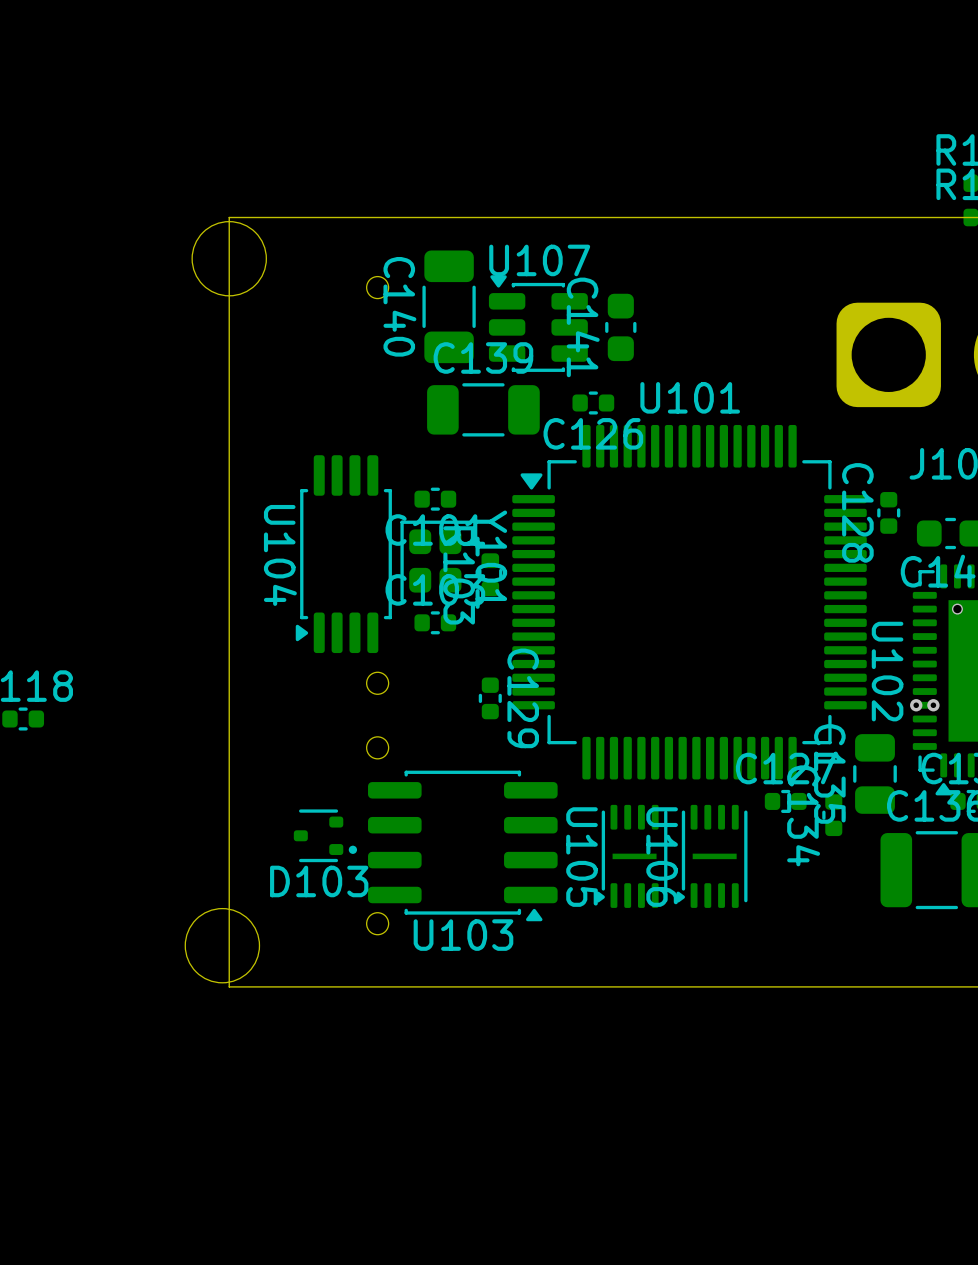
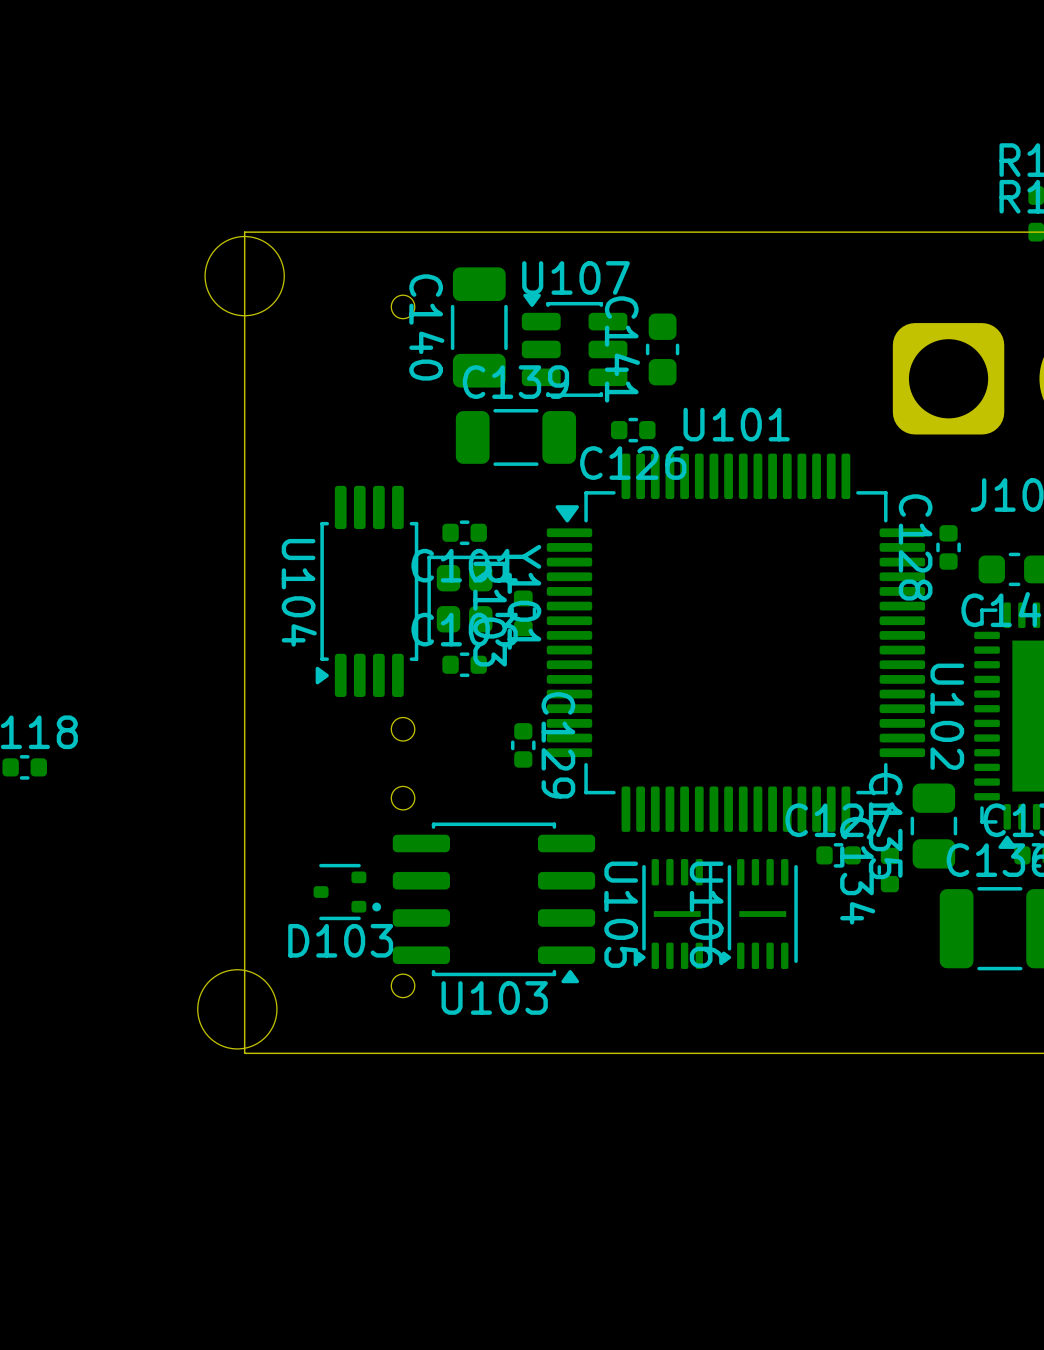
via: (957, 609) -> none
via: (916, 705) -> none
via: (933, 705) -> none

